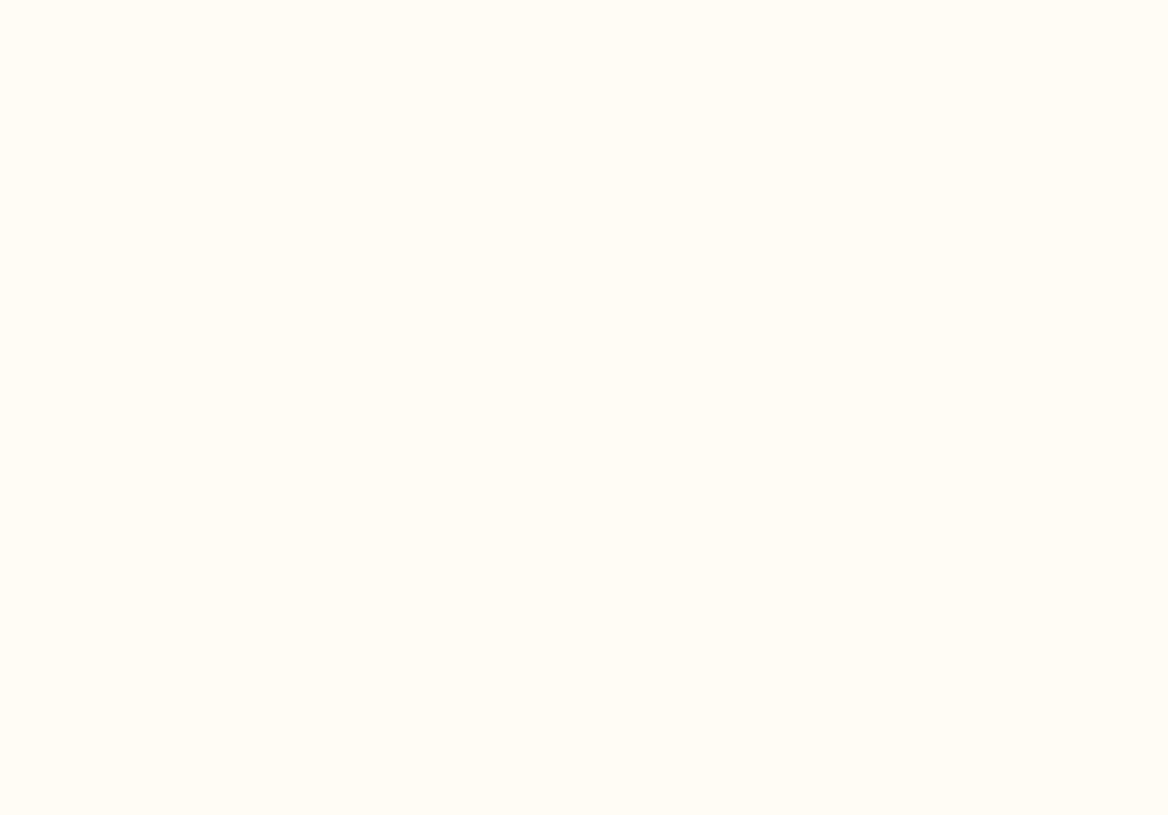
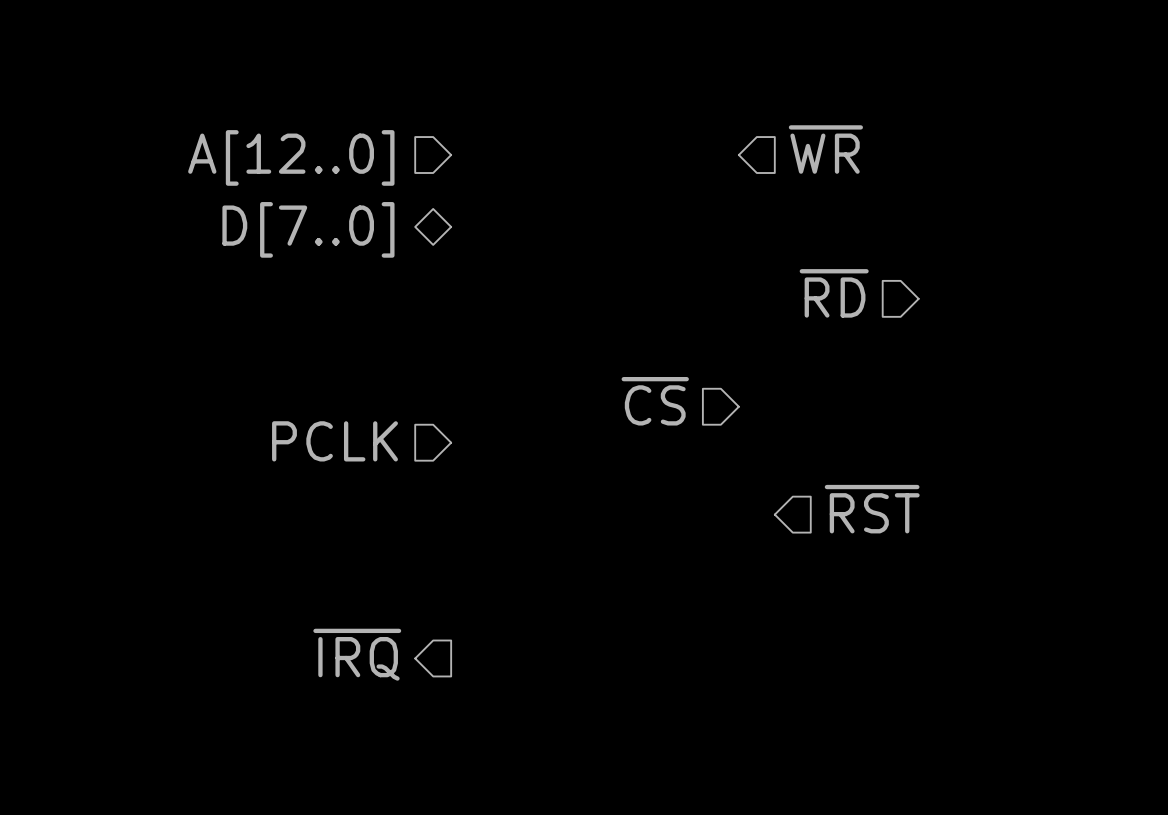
hierarchical label: none -> ~{WR} (825, 149)
hierarchical label: none -> A[12..0] (291, 157)
hierarchical label: none -> D[7..0] (308, 229)
hierarchical label: none -> ~{RD} (834, 293)
hierarchical label: none -> ~{CS} (655, 401)
hierarchical label: none -> PCLK (335, 441)
hierarchical label: none -> ~{RST} (872, 509)
hierarchical label: none -> ~{IRQ} (357, 654)

